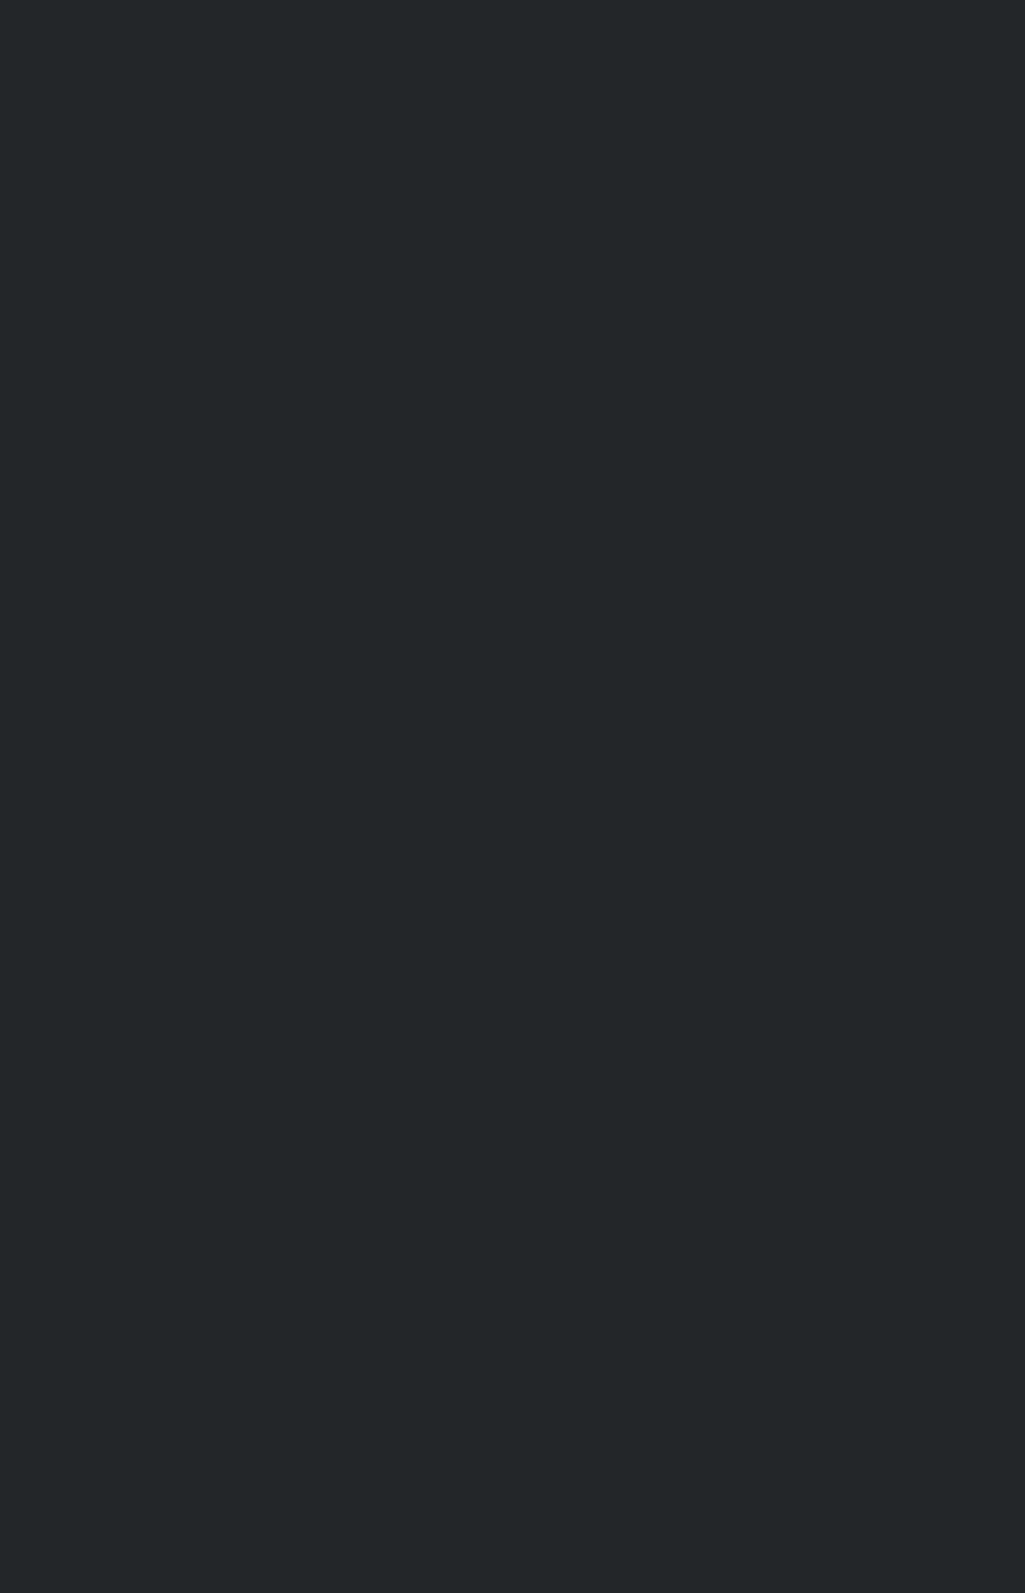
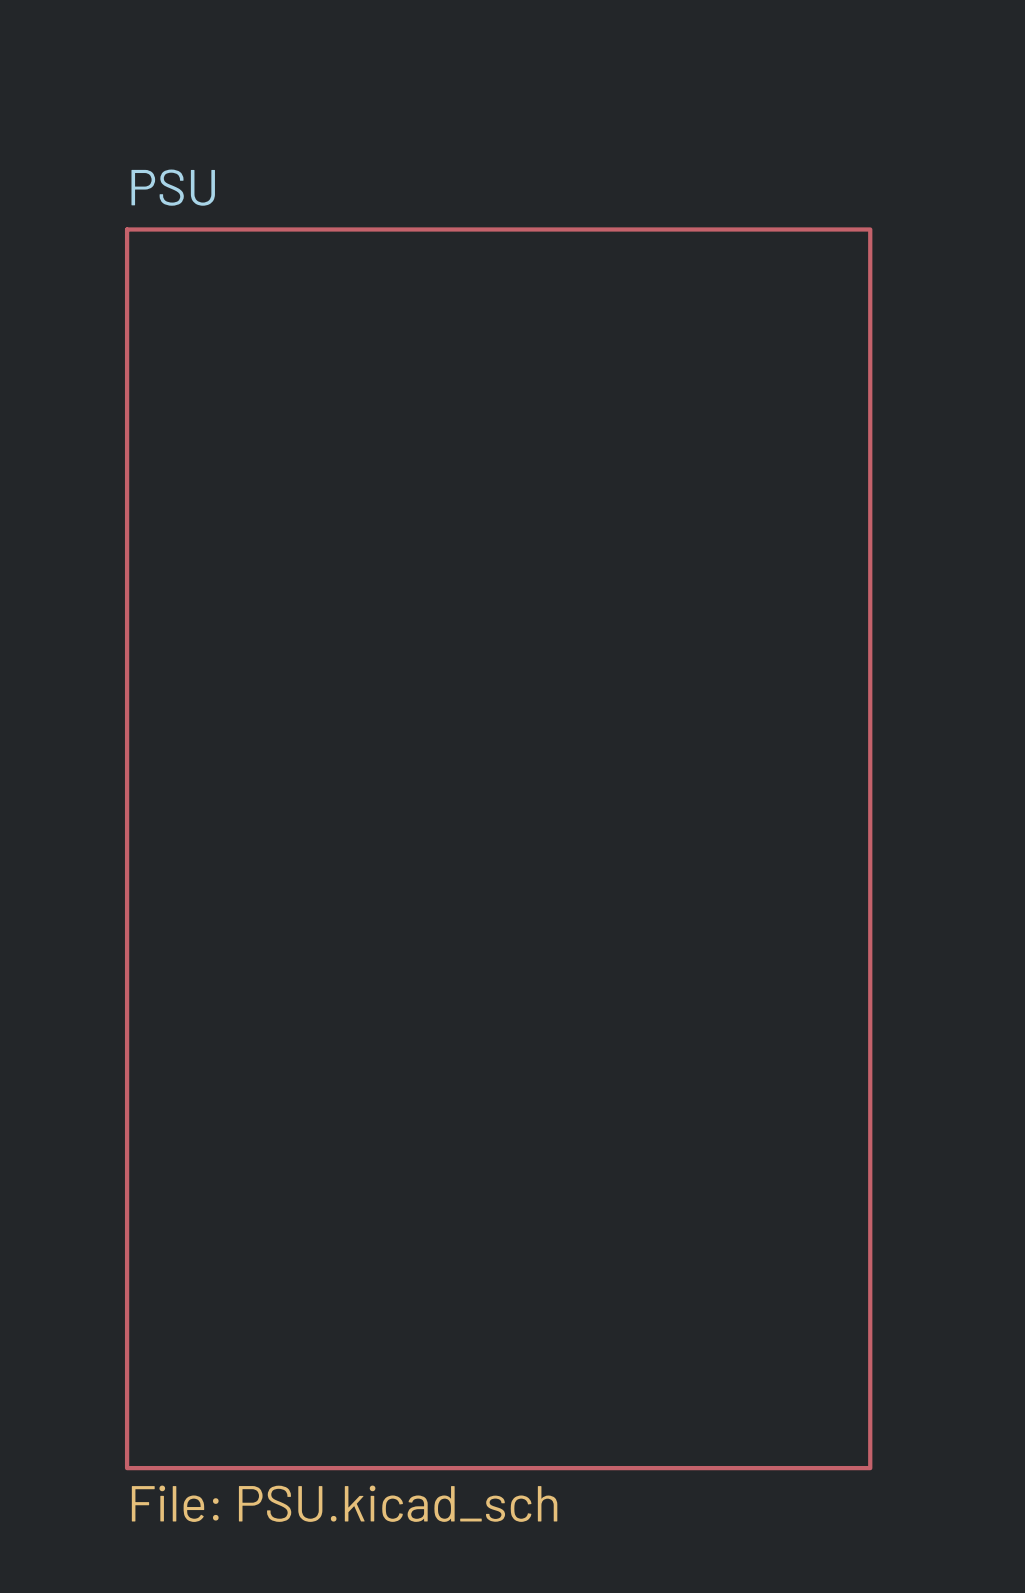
sheet PSU: none -> File: PSU.kicad_sch (498, 848)

